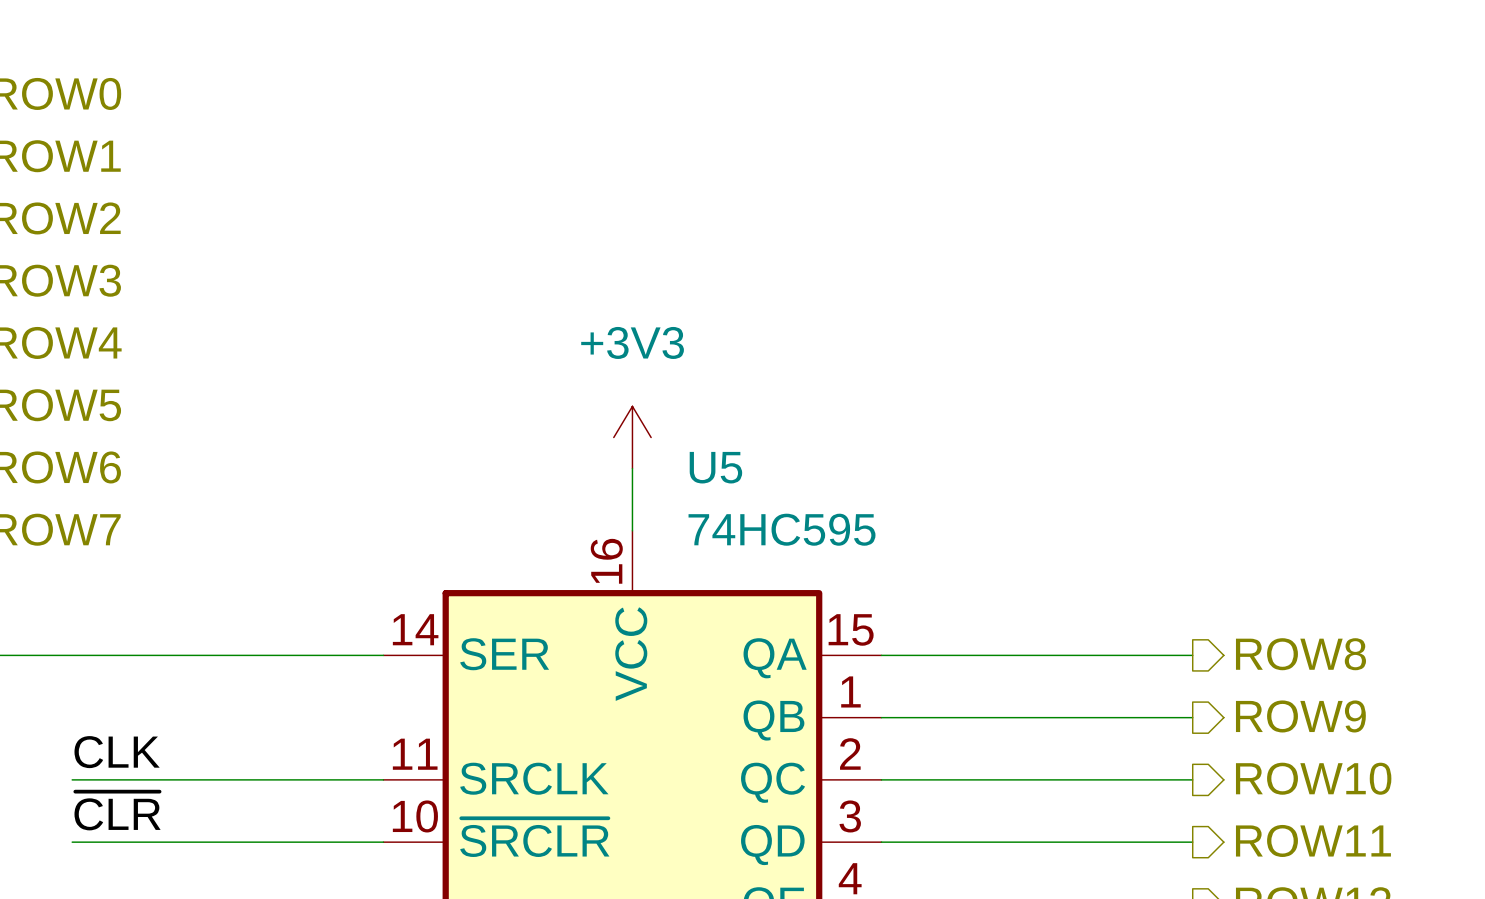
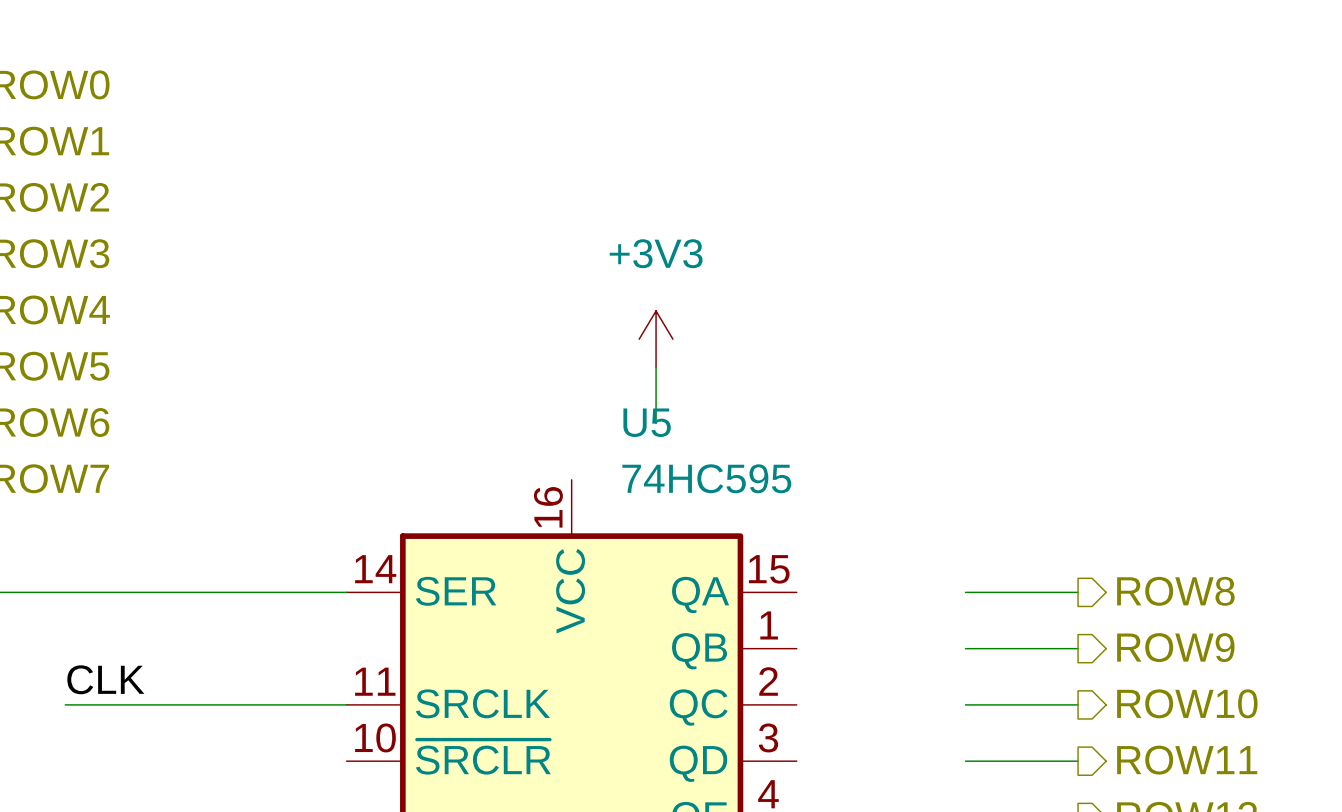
power symbol position: +3V3 (632, 437) -> +3V3 (656, 339)
wire: (632, 468) (632, 530) -> (656, 367) (656, 423)
wire: (881, 655) (1068, 655) -> none
wire: (881, 717) (1068, 717) -> none
wire: (881, 779) (1068, 779) -> none
label: ~{CLR} (117, 811) -> none
wire: (72, 842) (383, 842) -> none
wire: (881, 842) (1068, 842) -> none

